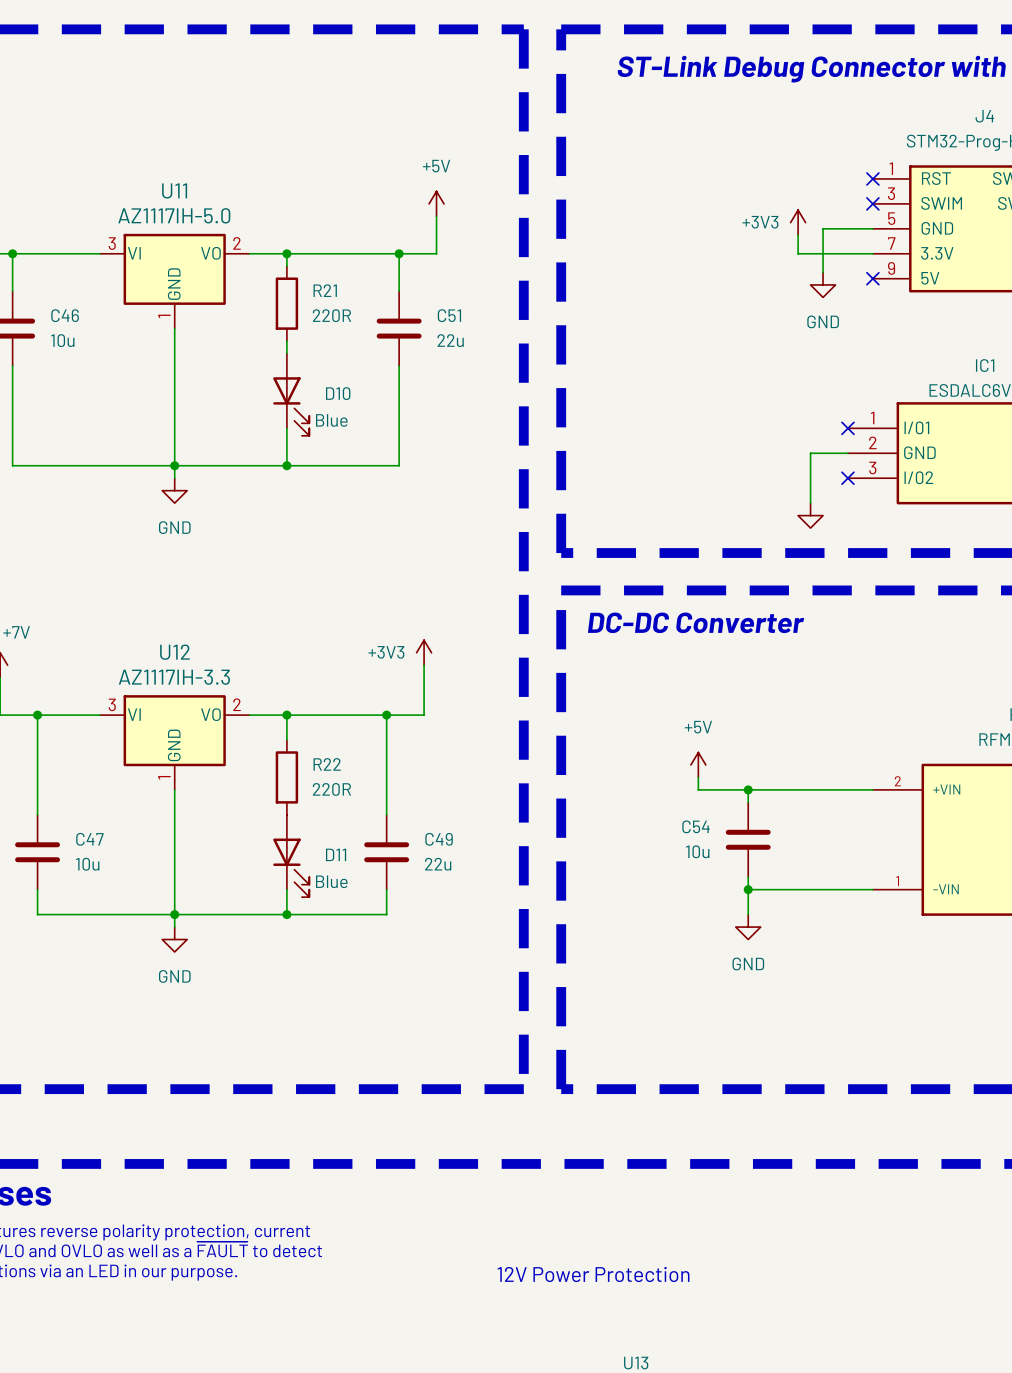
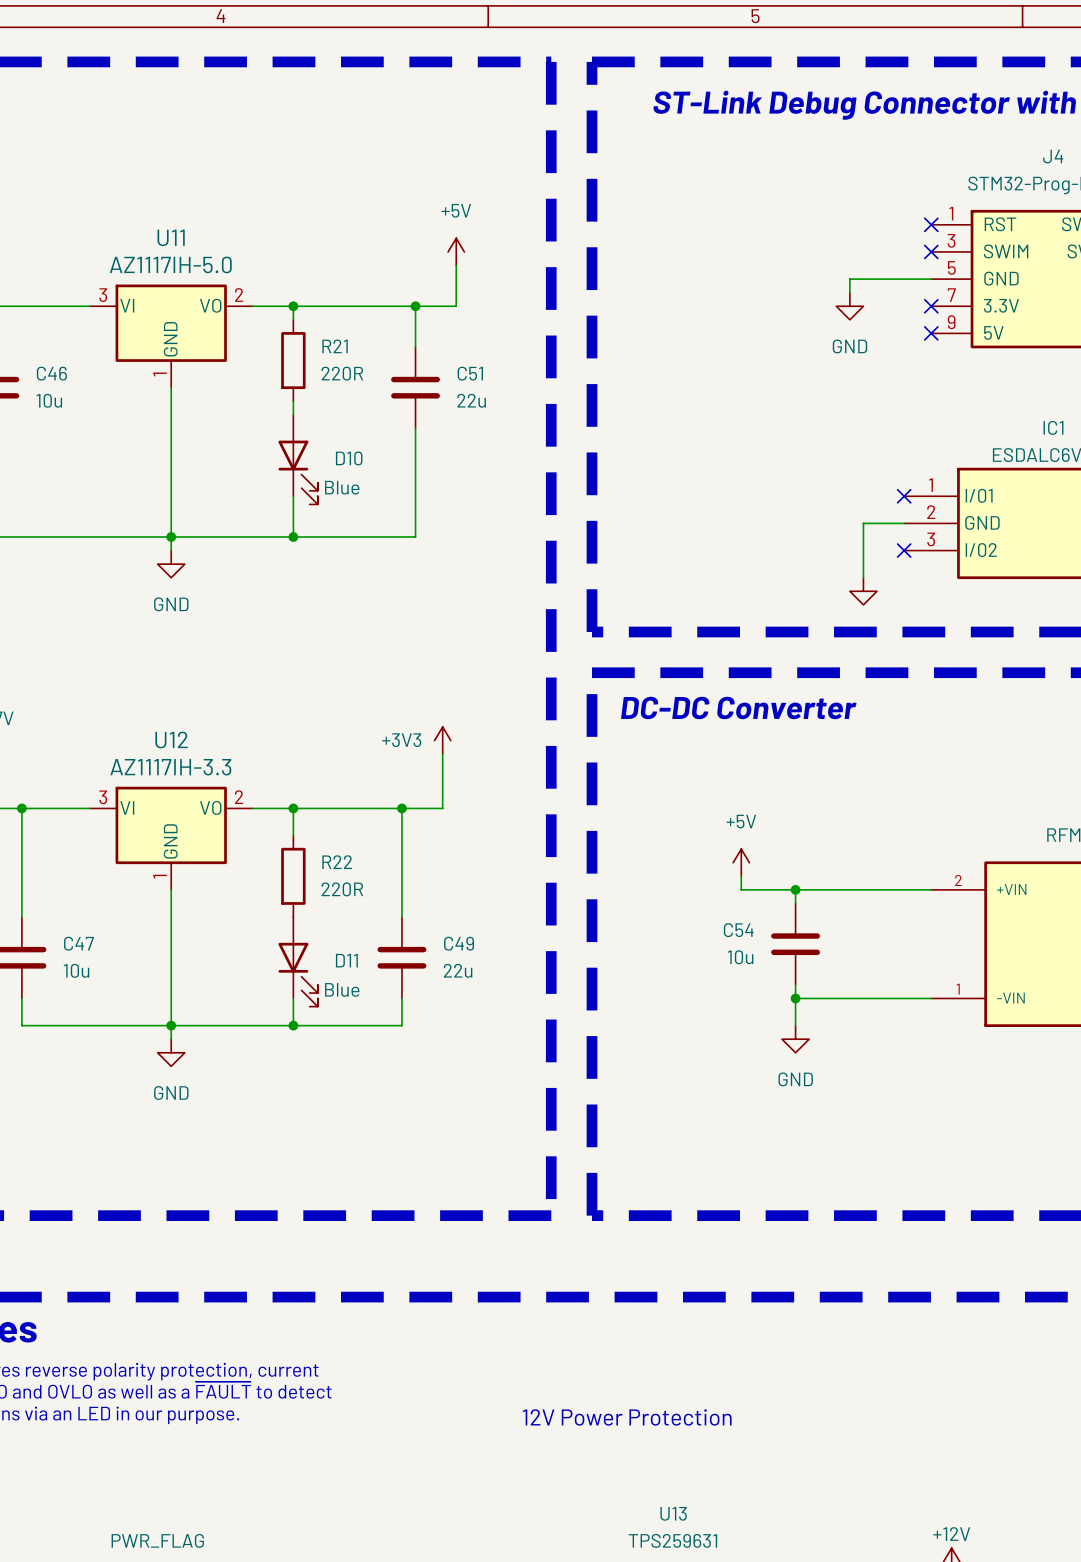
power symbol: +3V3 (798, 222) -> none
wire: (823, 228) (823, 272) -> (877, 279) (849, 279) (849, 285)
wire: (798, 241) (798, 253) (872, 253) -> none
no-connect mark: none -> (931, 306)
power symbol position: GND (823, 284) -> GND (849, 306)

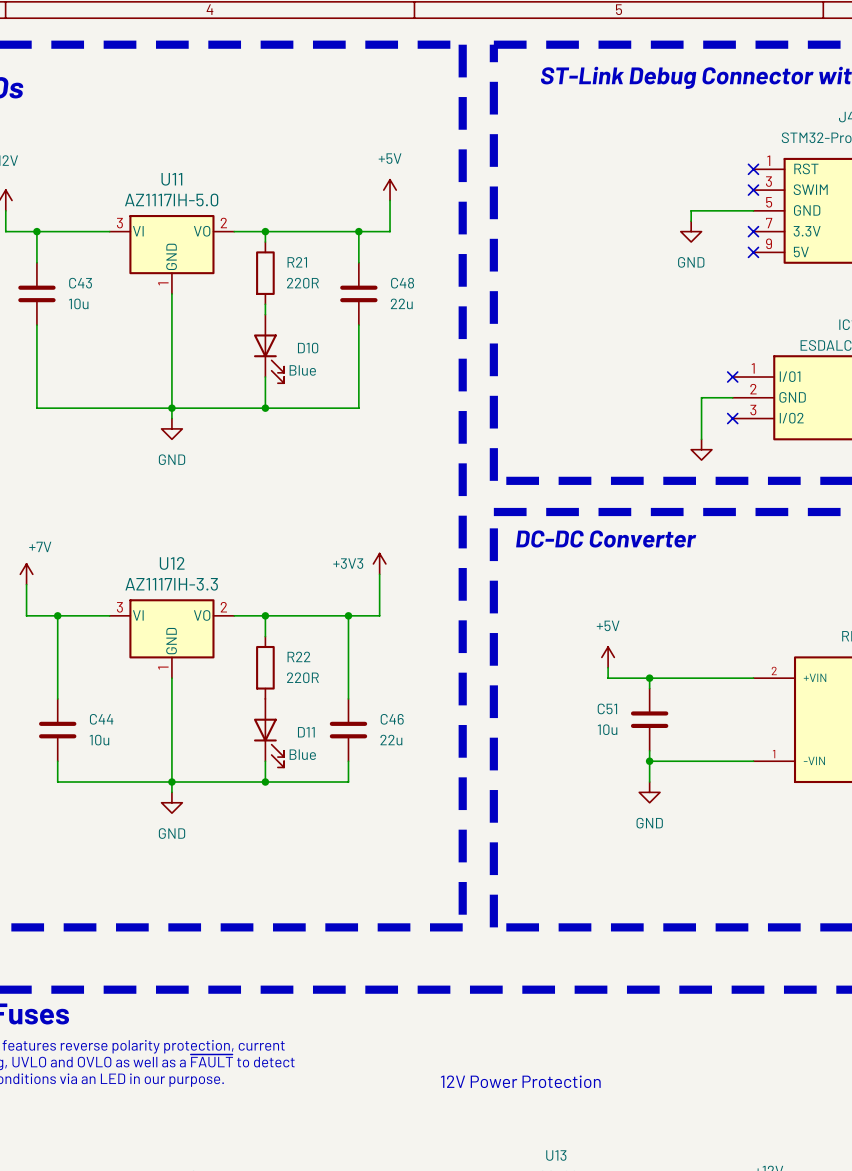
C46 name: C46 (51, 373) -> C43 (80, 283)
C51 name: C51 (470, 373) -> C48 (402, 283)
C54 name: C54 (738, 930) -> C51 (607, 708)
C47 name: C47 (78, 943) -> C44 (101, 719)
C49 name: C49 (459, 943) -> C46 (392, 719)

